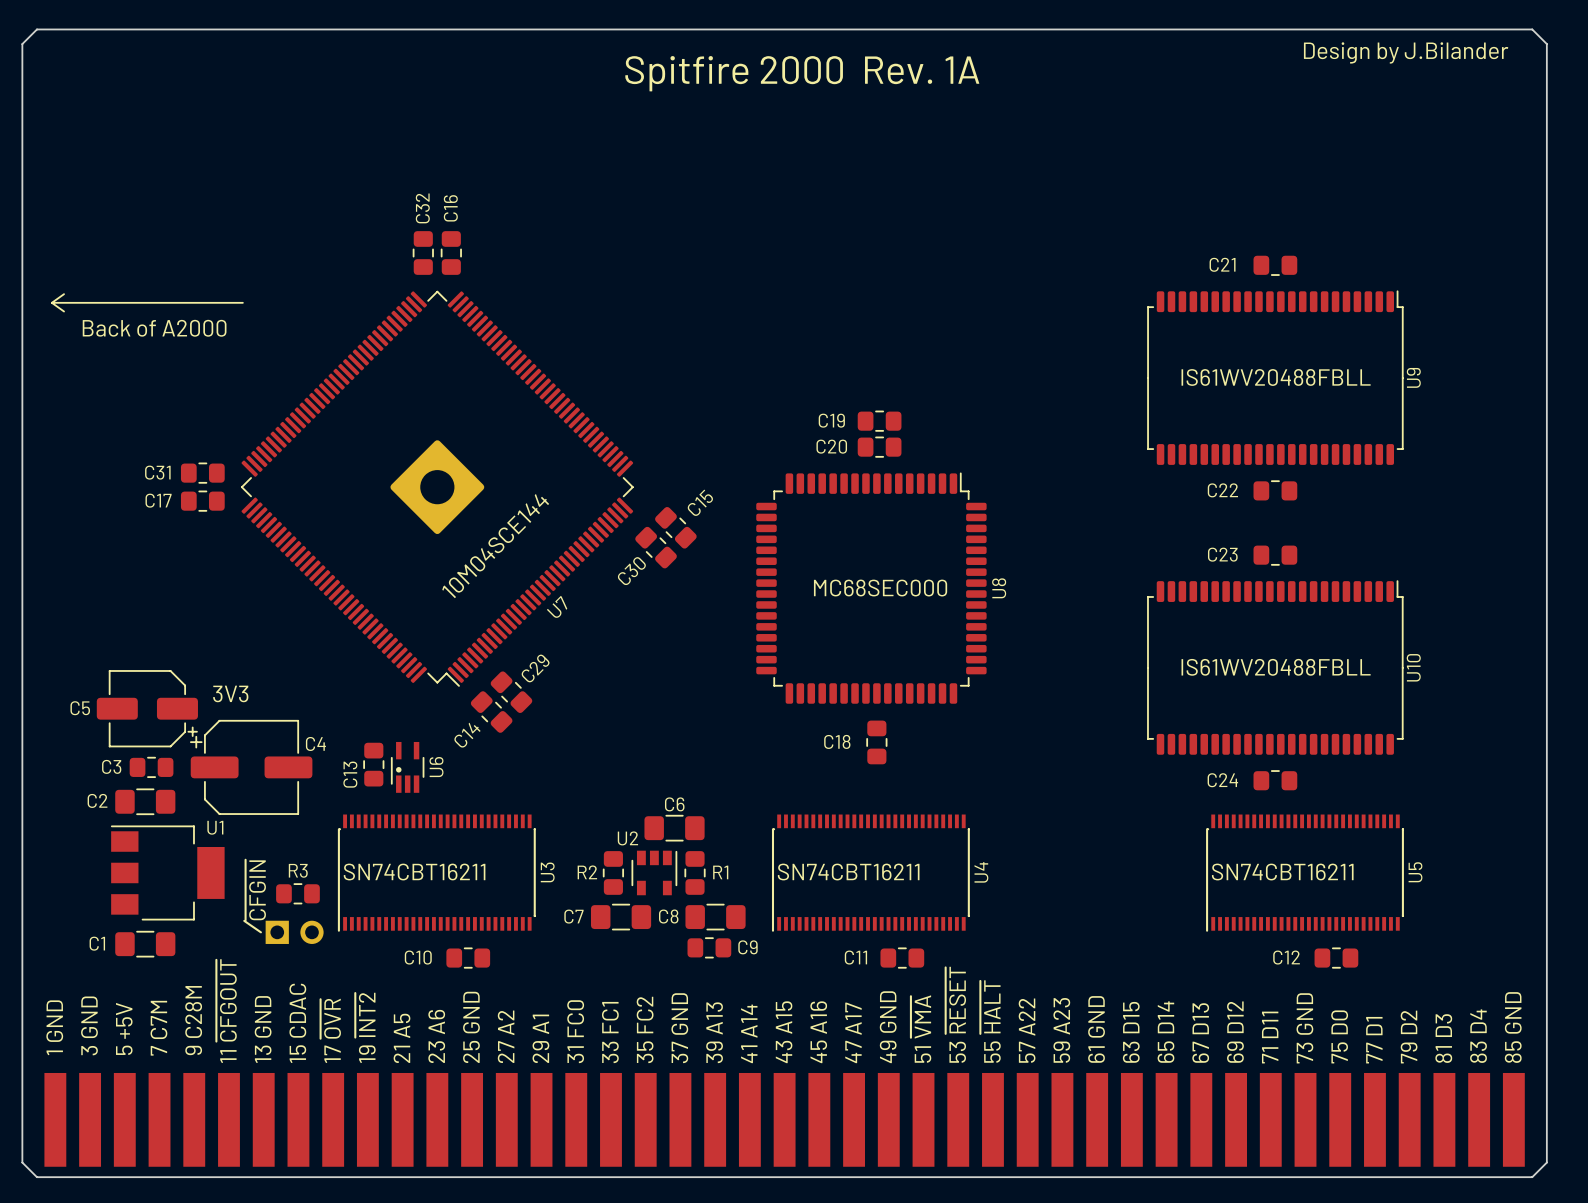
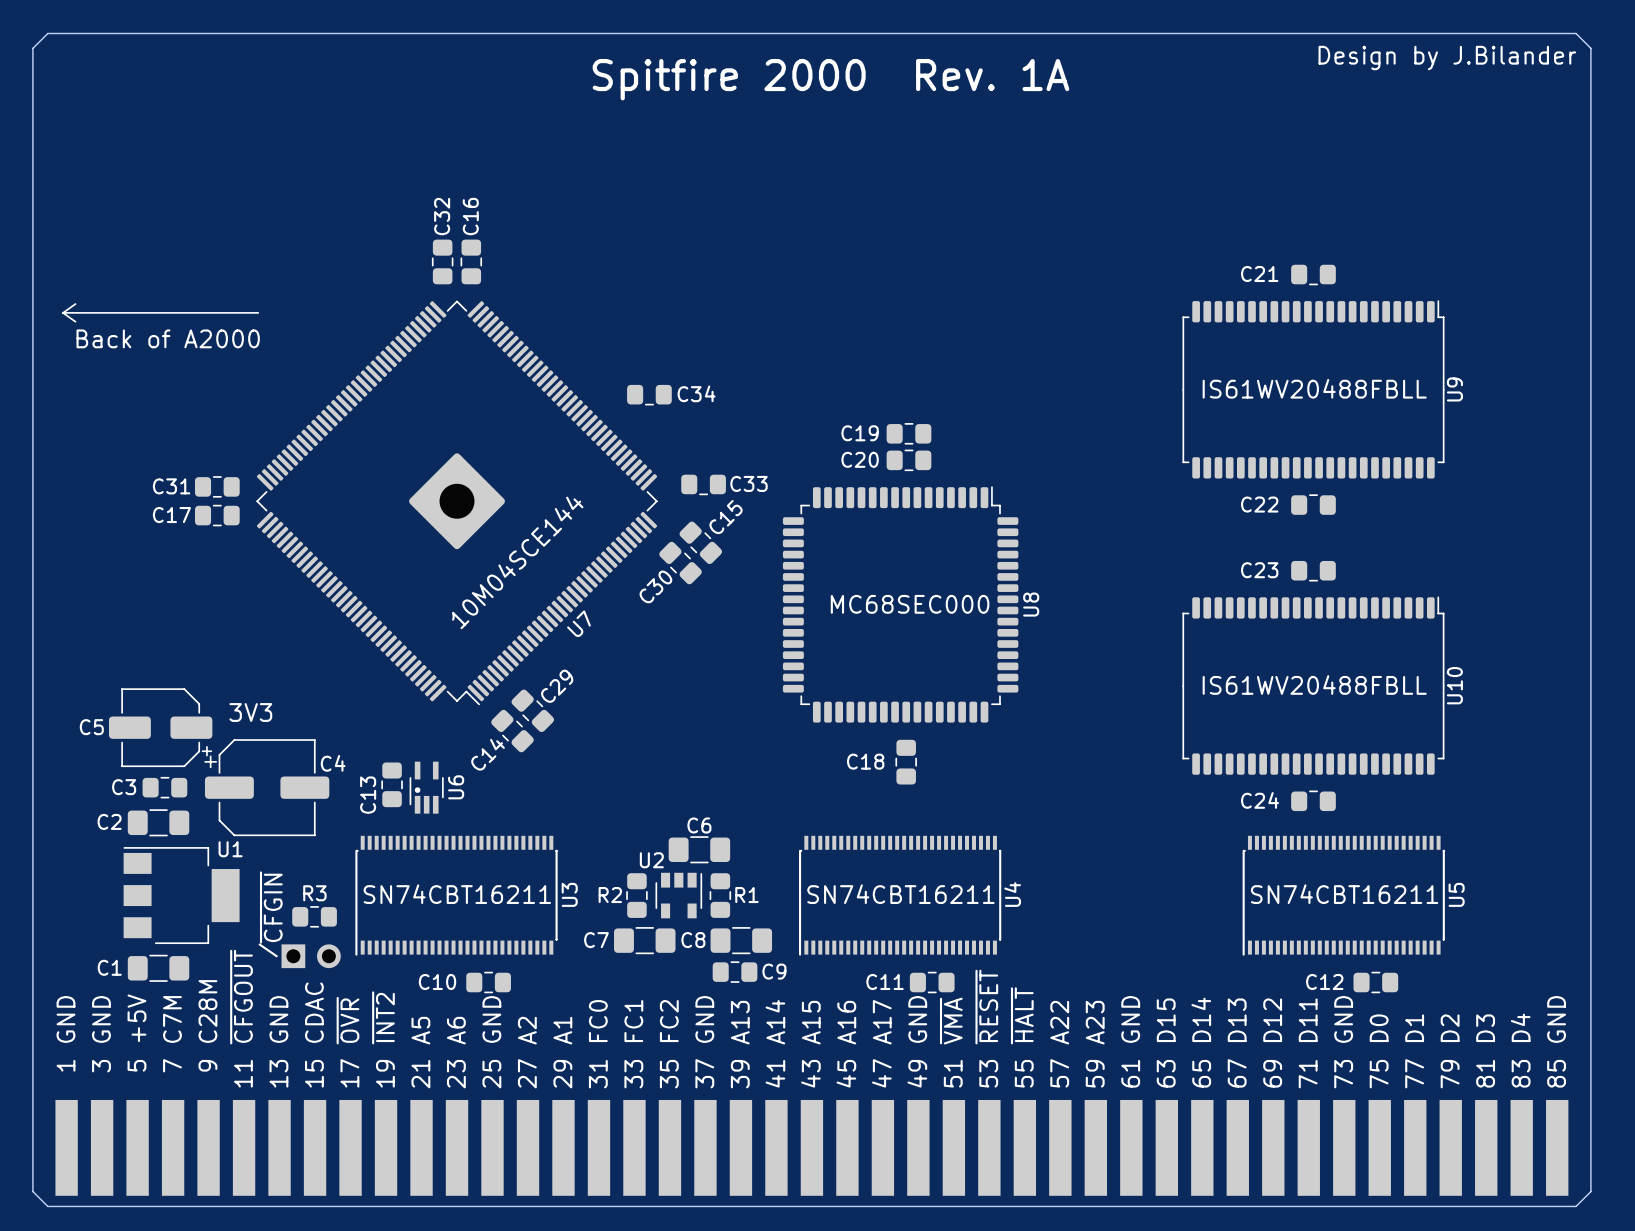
C34: none -> (649, 395)
C33: none -> (703, 484)

